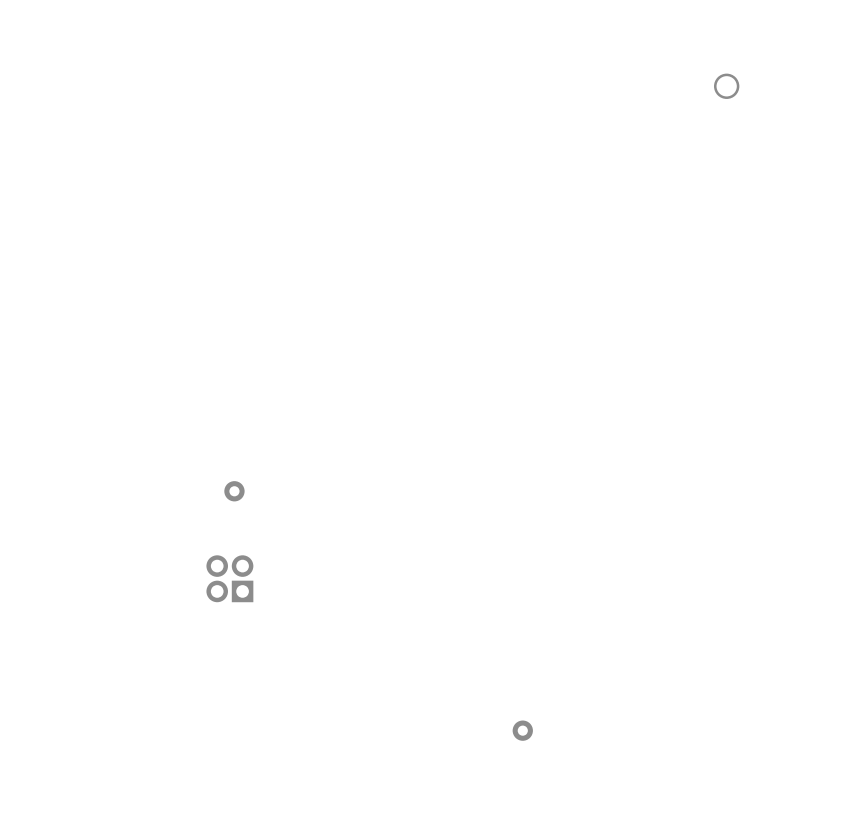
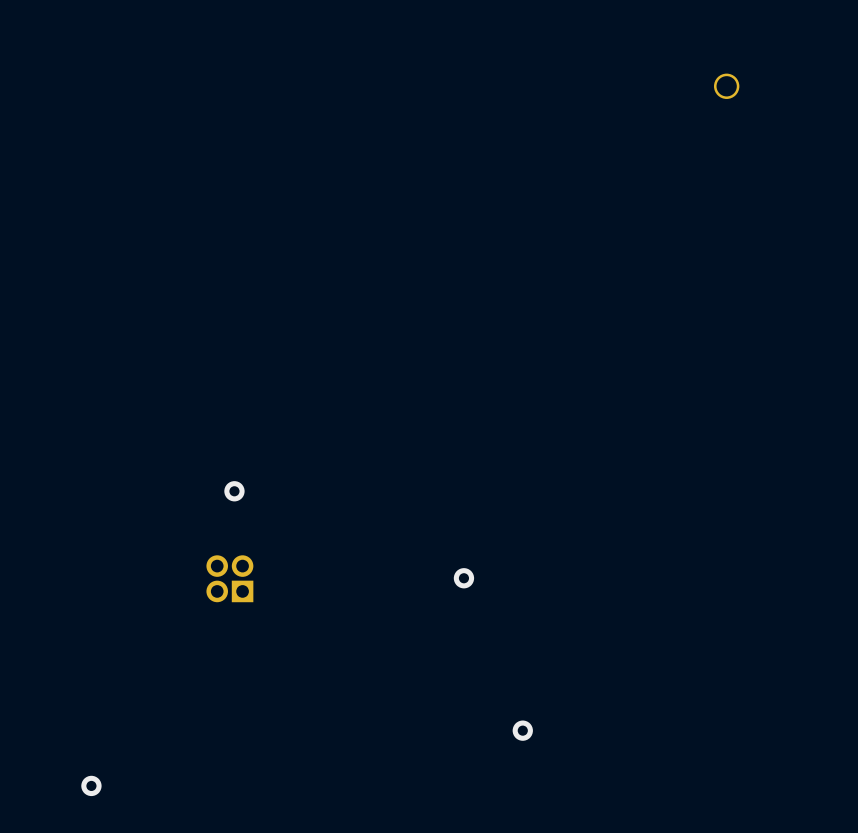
via: none -> (463, 578)
via: none -> (91, 785)

